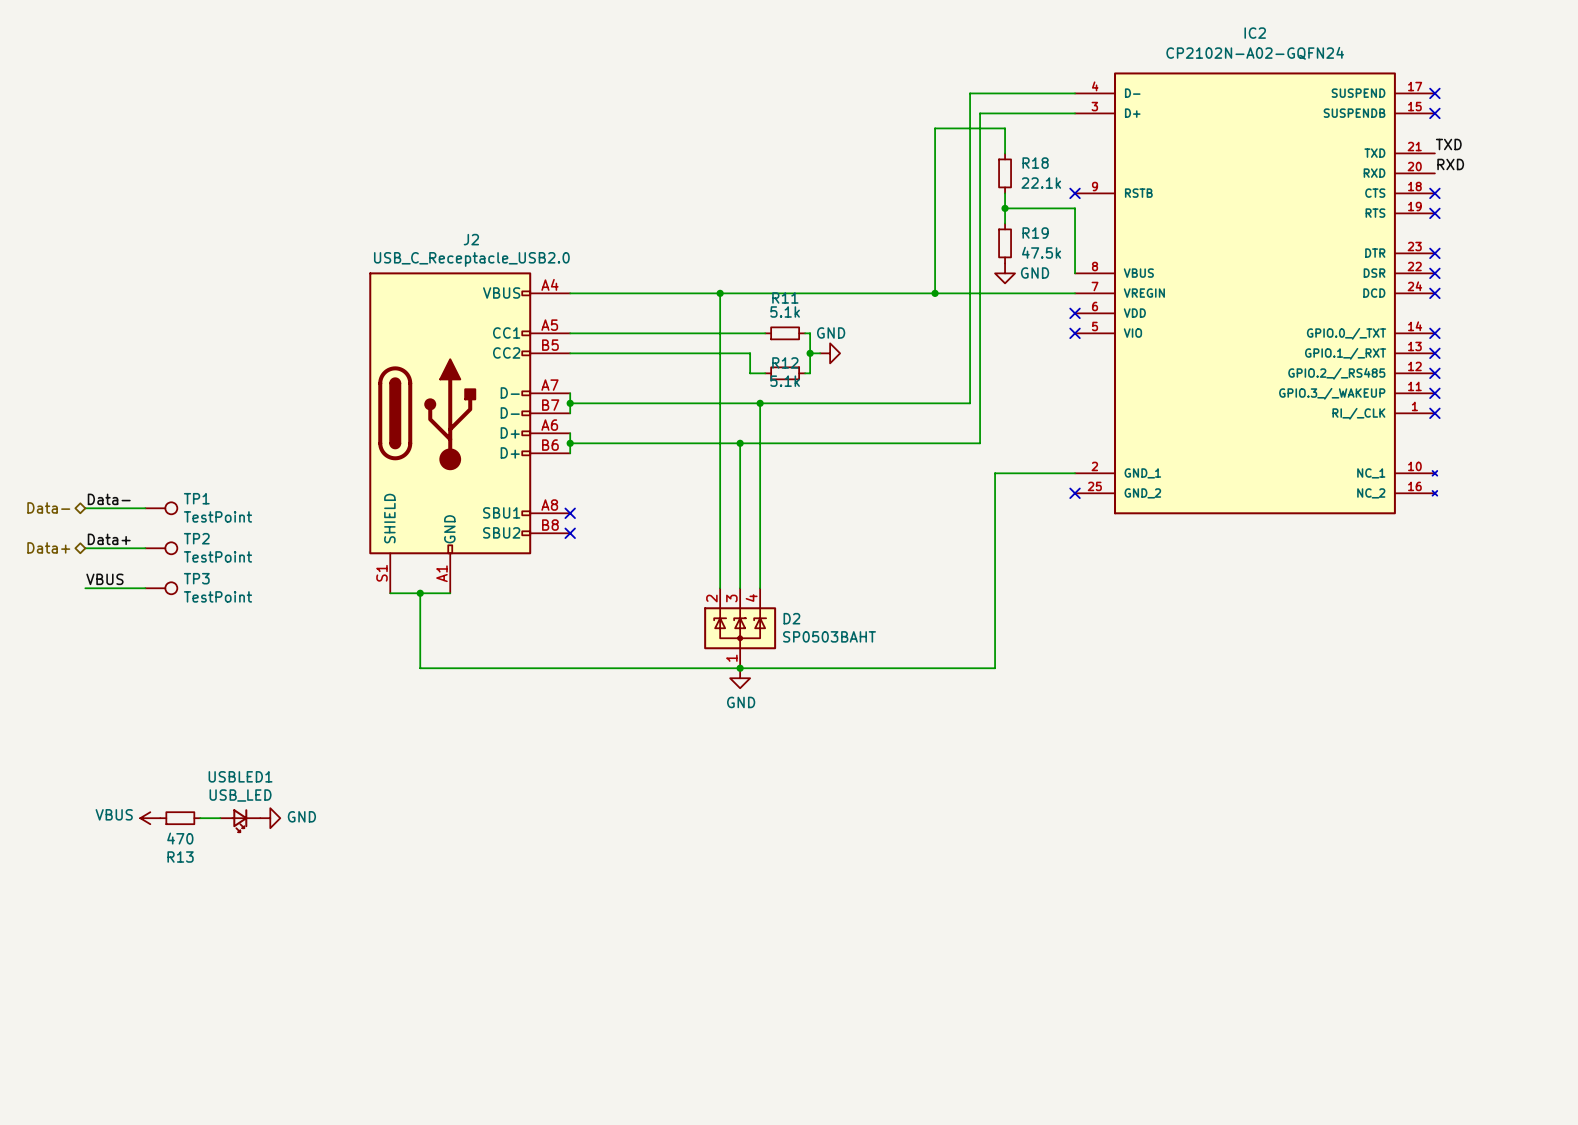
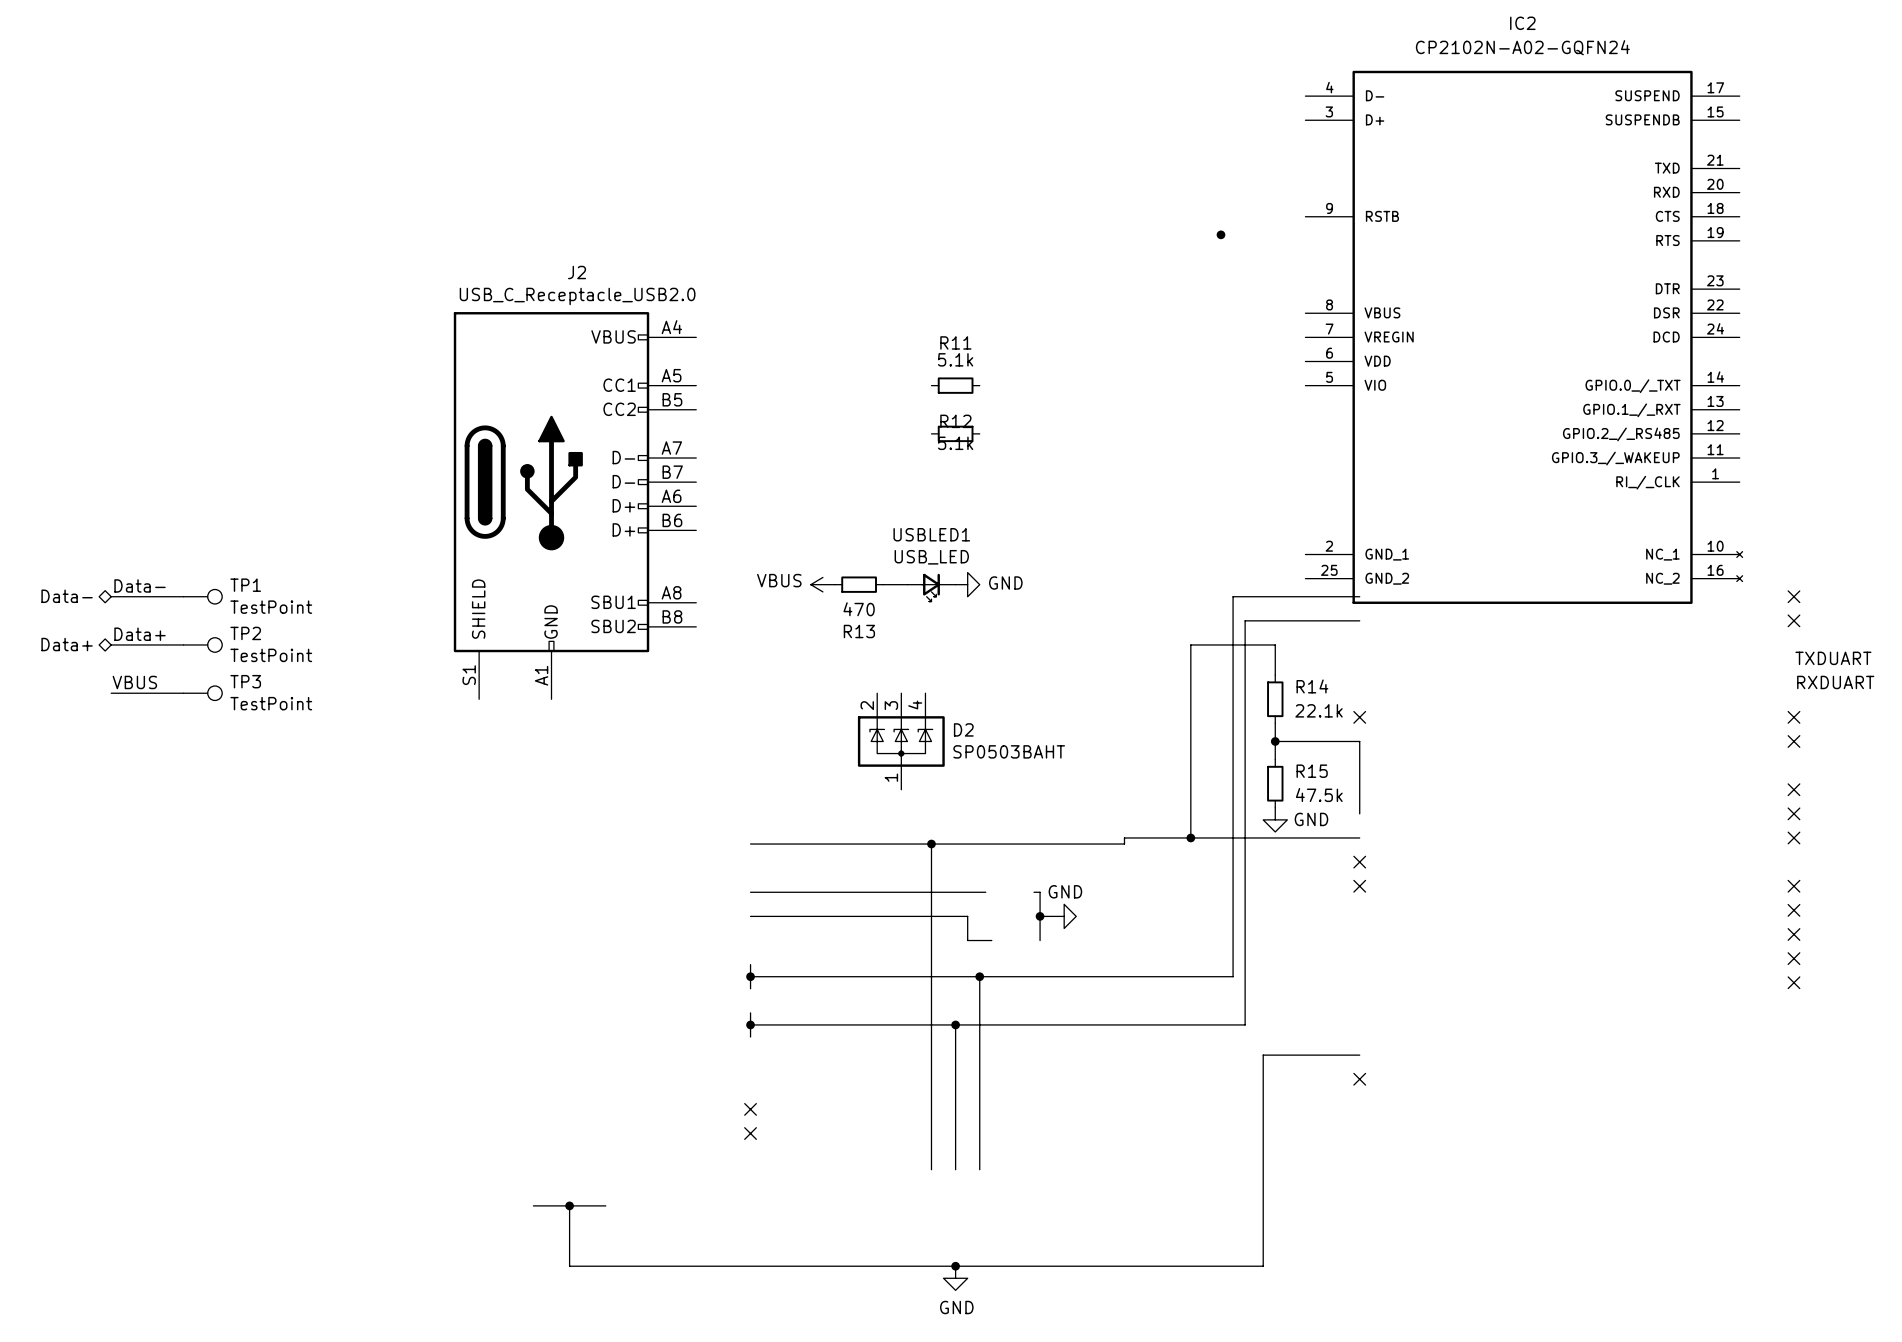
wire: (1075, 93) (970, 93) (970, 403) (570, 403) -> none
no-connect mark: (1434, 93) -> none
wire: (1075, 113) (980, 113) (980, 443) (570, 443) -> none
no-connect mark: (1434, 113) -> none
label: TXD (1448, 144) -> none
wire: (1005, 153) (1005, 128) (935, 128) (935, 293) -> none
label: RXD (1450, 164) -> none
R18: 22.1k (1005, 173) -> none
wire: (1005, 193) (1005, 223) -> none
no-connect mark: (1075, 193) -> none
no-connect mark: (1434, 193) -> none
wire: (1005, 208) (1075, 208) (1075, 273) -> none
no-connect mark: (1434, 213) -> none
R19: 47.5k (1005, 243) -> none
no-connect mark: (1434, 253) -> none
power symbol: GND (1005, 273) -> none
no-connect mark: (1434, 273) -> none
wire: (570, 293) (1075, 293) -> none
wire: (720, 293) (720, 588) -> none
junction: (720, 293) -> none
junction: (935, 293) -> none
no-connect mark: (1434, 293) -> none
no-connect mark: (1075, 313) -> none
wire: (570, 333) (765, 333) -> none
wire: (805, 333) (810, 333) (810, 373) (805, 373) -> none
no-connect mark: (1075, 333) -> none
no-connect mark: (1434, 333) -> none
wire: (570, 353) (750, 353) (750, 373) (765, 373) -> none
wire: (810, 353) (820, 353) -> none
junction: (810, 353) -> none
power symbol: GND (830, 353) -> none
no-connect mark: (1434, 353) -> none
no-connect mark: (1434, 373) -> none
wire: (570, 393) (570, 413) -> none
no-connect mark: (1434, 393) -> none
junction: (570, 403) -> none
wire: (760, 403) (760, 588) -> none
junction: (760, 403) -> none
no-connect mark: (1434, 413) -> none
wire: (570, 433) (570, 453) -> none
junction: (570, 443) -> none
wire: (740, 443) (740, 588) -> none
junction: (740, 443) -> none
wire: (1075, 473) (995, 473) (995, 668) (420, 668) (420, 593) -> none
no-connect mark: (1075, 493) -> none
power symbol: none -> VBUS (822, 584)
wire: none -> (883, 584) (907, 584)
power symbol: none -> GND (967, 584)
wire: none -> (1359, 596) (1233, 596) (1233, 976) (750, 976)
no-connect mark: none -> (1793, 596)
no-connect mark: (570, 513) -> none
wire: none -> (1359, 620) (1245, 620) (1245, 1024) (750, 1024)
no-connect mark: none -> (1793, 620)
no-connect mark: (570, 533) -> none
label: none -> TXDUART (1833, 658)
wire: none -> (1275, 675) (1275, 644) (1190, 644) (1190, 837)
label: none -> RXDUART (1835, 682)
wire: (390, 593) (450, 593) -> none
junction: (420, 593) -> none
R14: none -> 22.1k (1275, 699)
no-connect mark: none -> (1359, 717)
no-connect mark: none -> (1793, 717)
wire: none -> (1275, 723) (1275, 759)
wire: none -> (1275, 741) (1359, 741) (1359, 813)
junction: none -> (1275, 741)
no-connect mark: none -> (1793, 741)
R15: none -> 47.5k (1275, 783)
junction: (740, 668) -> none
no-connect mark: none -> (1793, 789)
power symbol: GND (740, 678) -> none
no-connect mark: none -> (1793, 813)
power symbol: none -> GND (1275, 819)
junction: none -> (1190, 837)
wire: none -> (1359, 837) (1124, 837) (1124, 844) (750, 844)
no-connect mark: none -> (1793, 837)
wire: none -> (931, 844) (931, 1169)
junction: none -> (931, 844)
no-connect mark: none -> (1359, 862)
no-connect mark: none -> (1359, 886)
no-connect mark: none -> (1793, 886)
wire: none -> (750, 892) (985, 892)
wire: none -> (1034, 892) (1040, 892) (1040, 940)
no-connect mark: none -> (1793, 910)
wire: none -> (750, 916) (967, 916) (967, 940) (991, 940)
wire: none -> (1040, 916) (1052, 916)
junction: none -> (1040, 916)
power symbol: none -> GND (1064, 916)
no-connect mark: none -> (1793, 934)
no-connect mark: none -> (1793, 958)
wire: none -> (750, 964) (750, 988)
power symbol: VBUS (150, 818) -> none
R13 position: (180, 818) -> (859, 584)
wire: (200, 818) (220, 818) -> none
power symbol: GND (270, 818) -> none
USBLED1 position: (240, 820) -> (931, 587)
junction: none -> (750, 976)
wire: none -> (979, 976) (979, 1169)
junction: none -> (979, 976)
no-connect mark: none -> (1793, 982)
wire: none -> (750, 1012) (750, 1037)
junction: none -> (750, 1024)
wire: none -> (955, 1024) (955, 1169)
junction: none -> (955, 1024)
wire: none -> (1359, 1055) (1263, 1055) (1263, 1266) (569, 1266) (569, 1205)
no-connect mark: none -> (1359, 1079)
no-connect mark: none -> (750, 1109)
no-connect mark: none -> (750, 1133)
wire: none -> (533, 1205) (605, 1205)
junction: none -> (569, 1205)
junction: none -> (955, 1266)
power symbol: none -> GND (955, 1278)

